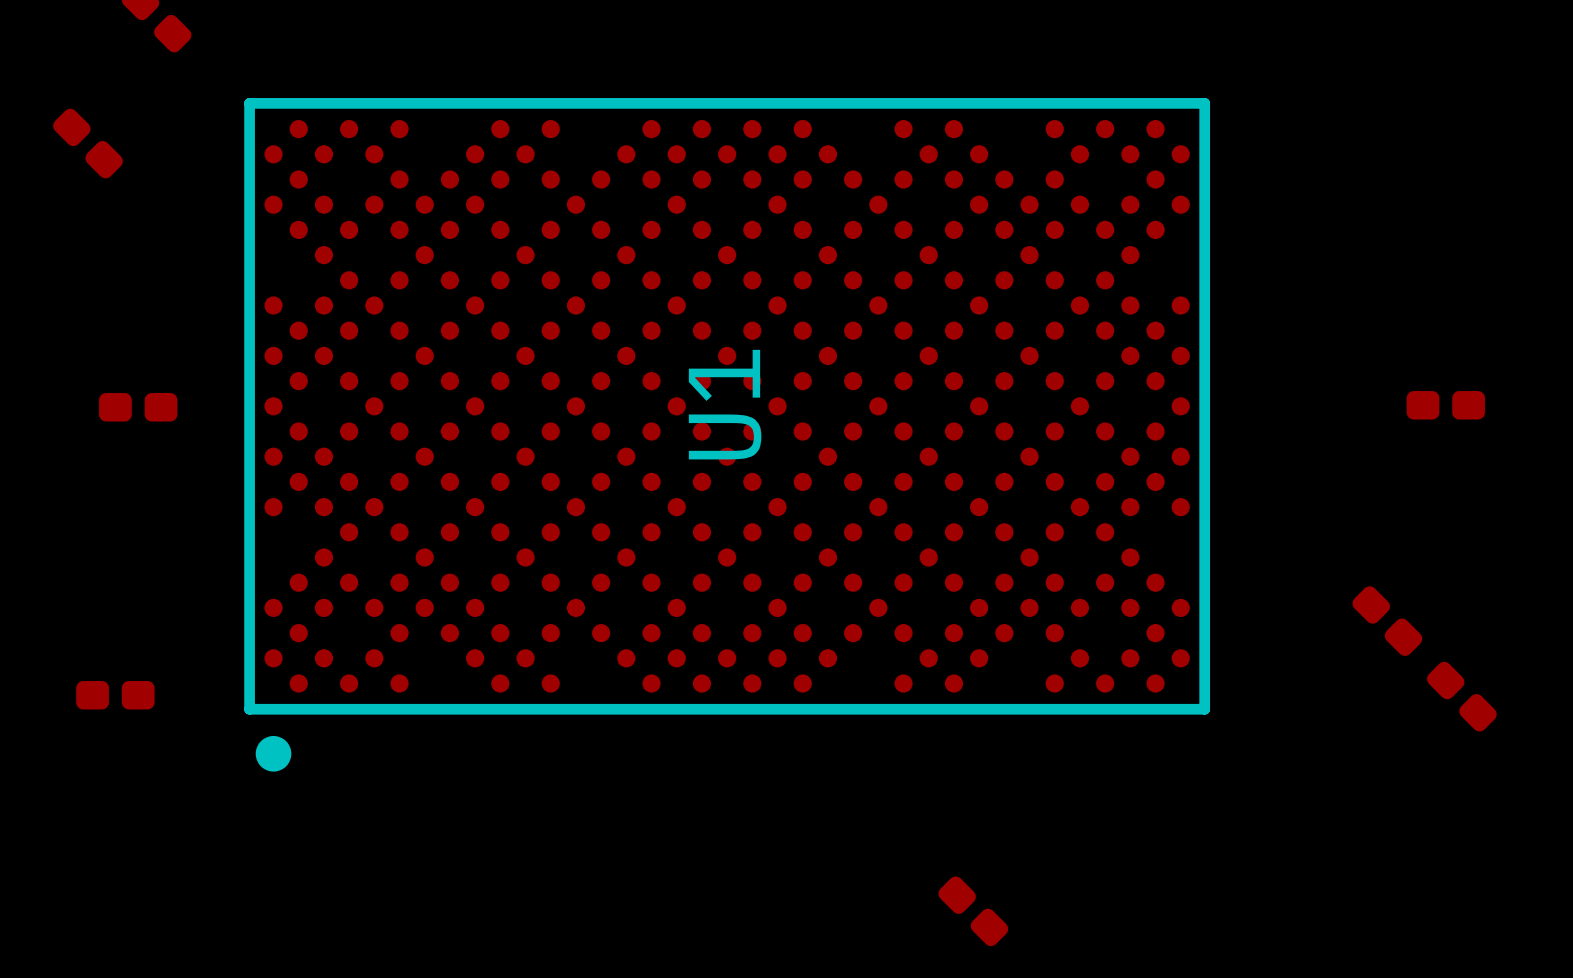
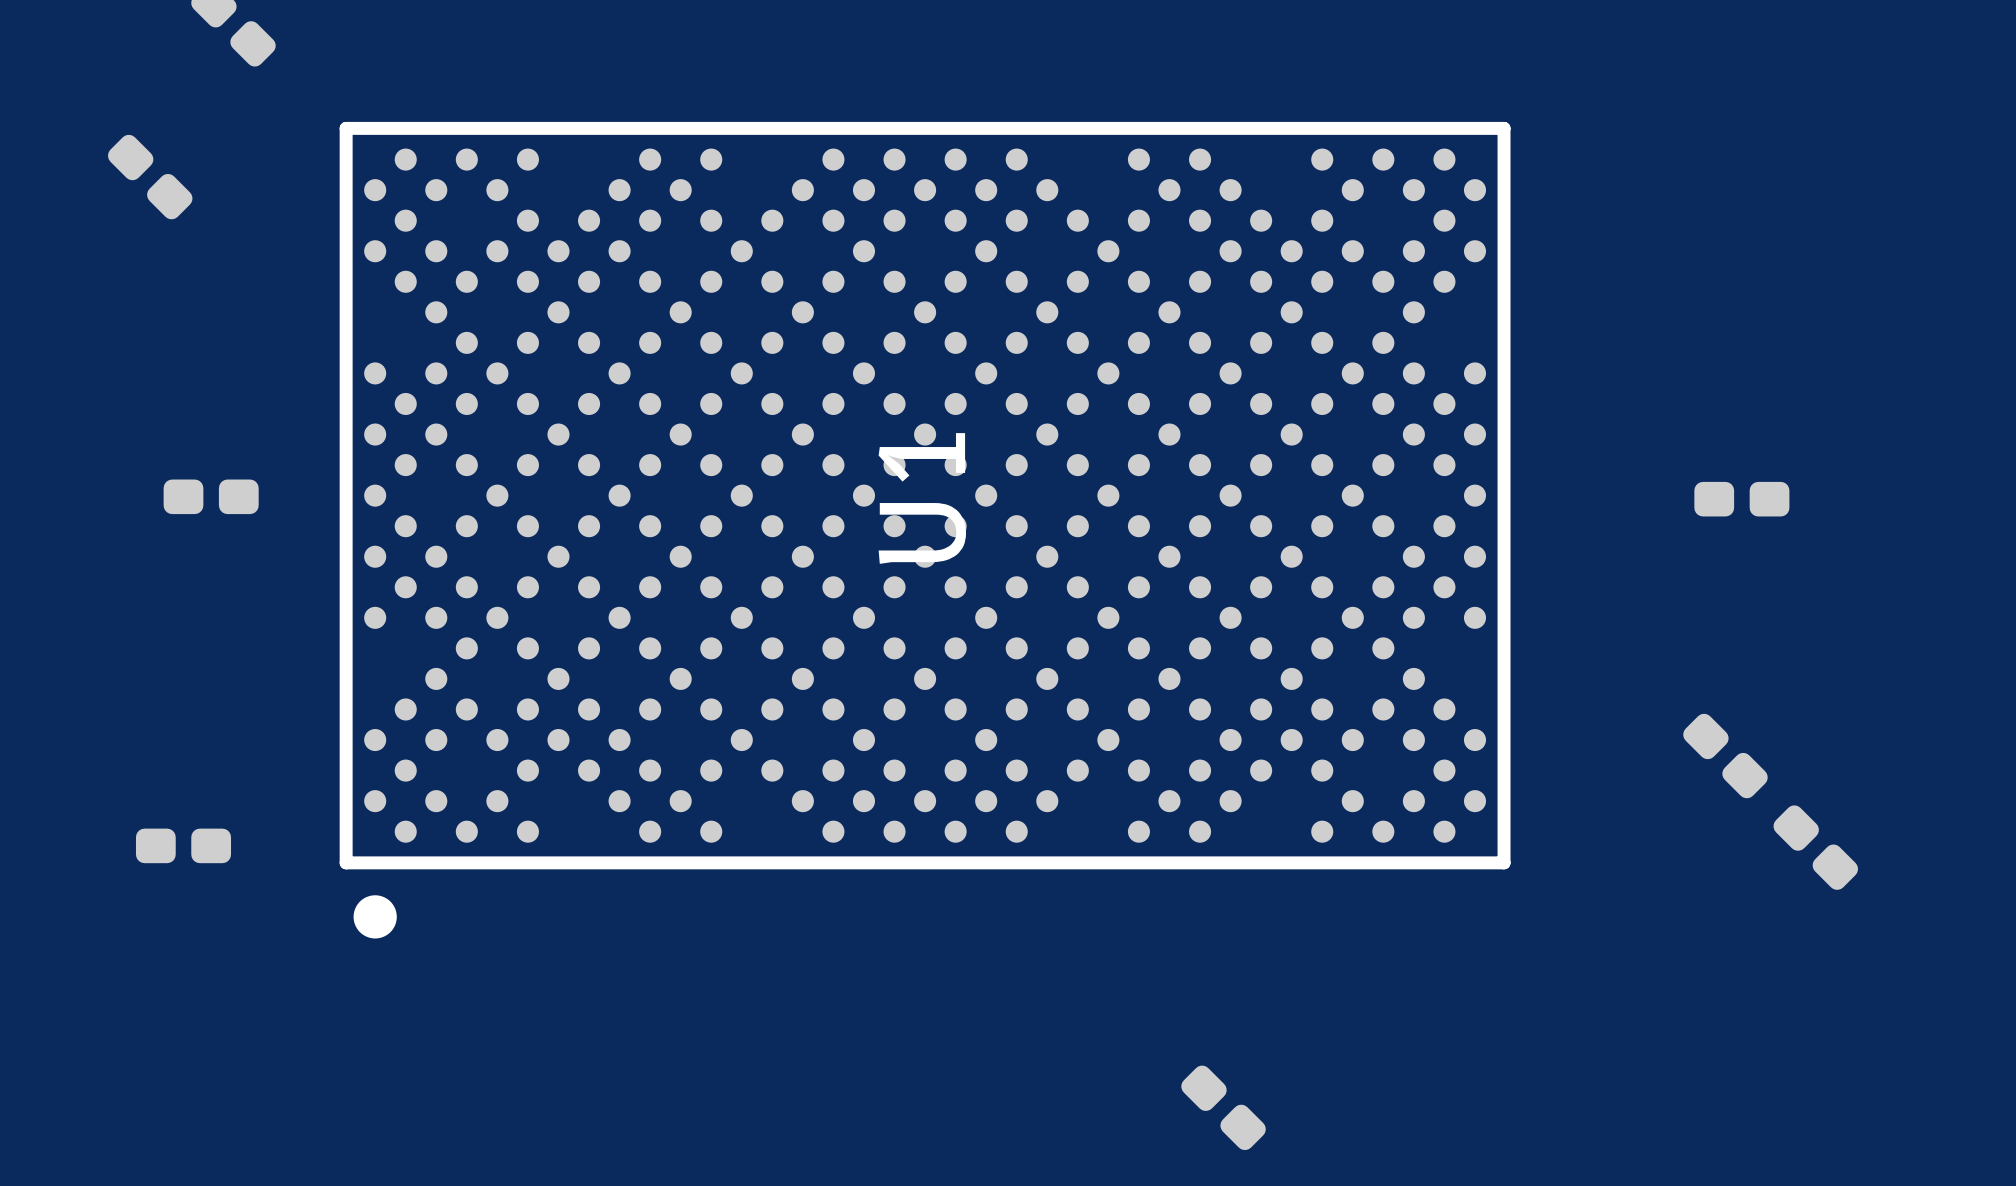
part position: (1445, 405) -> (1741, 499)

